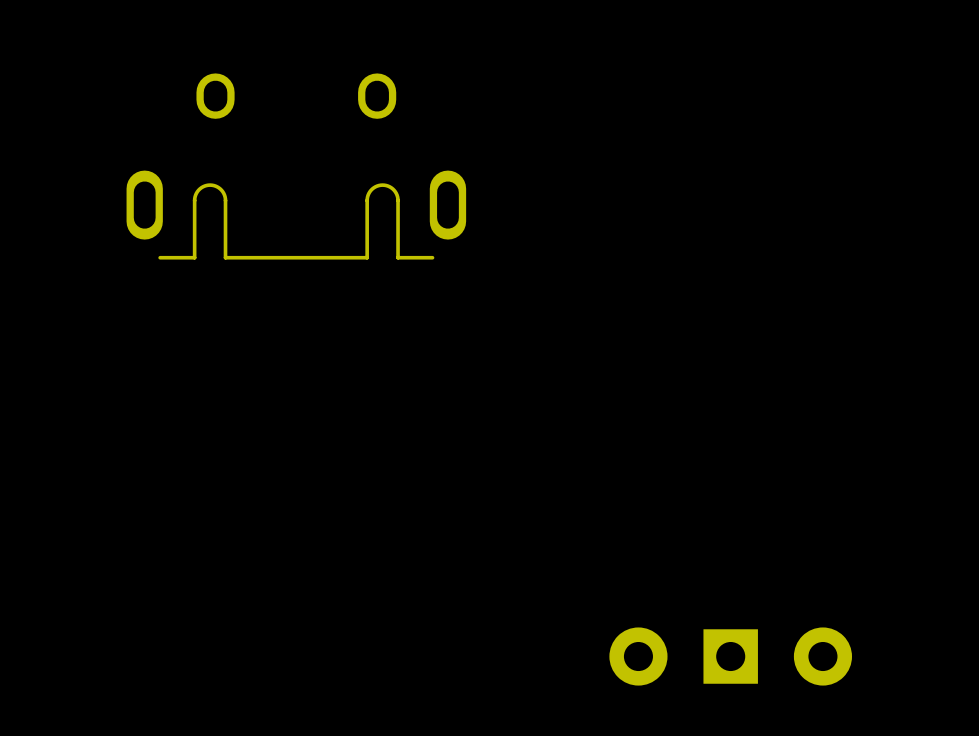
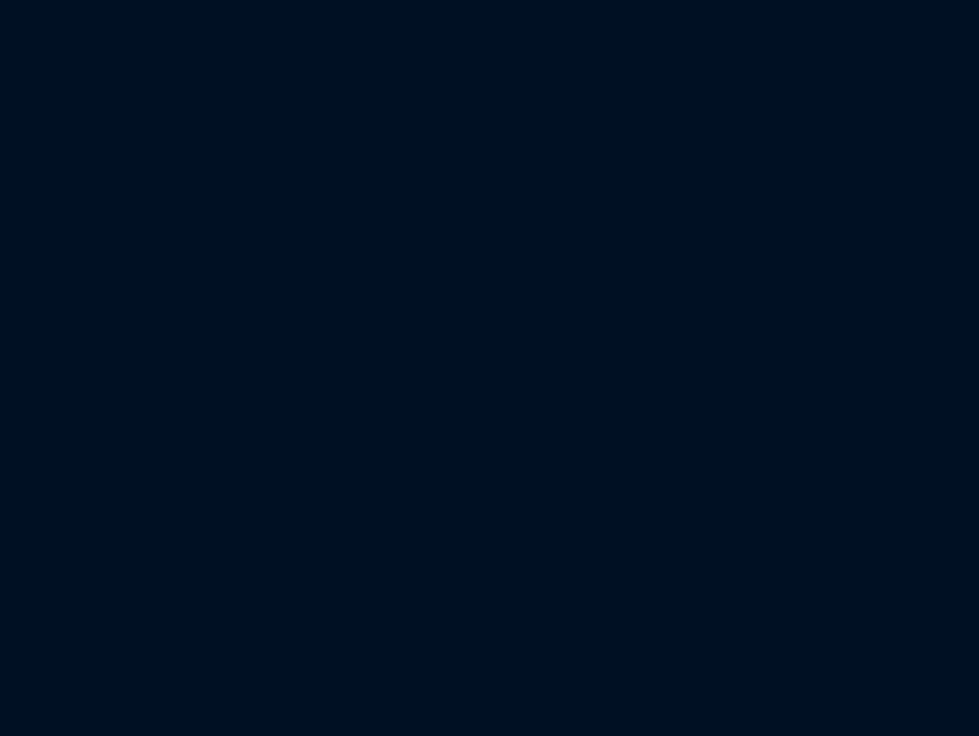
part: (296, 166) -> none
part: (730, 656) -> none

